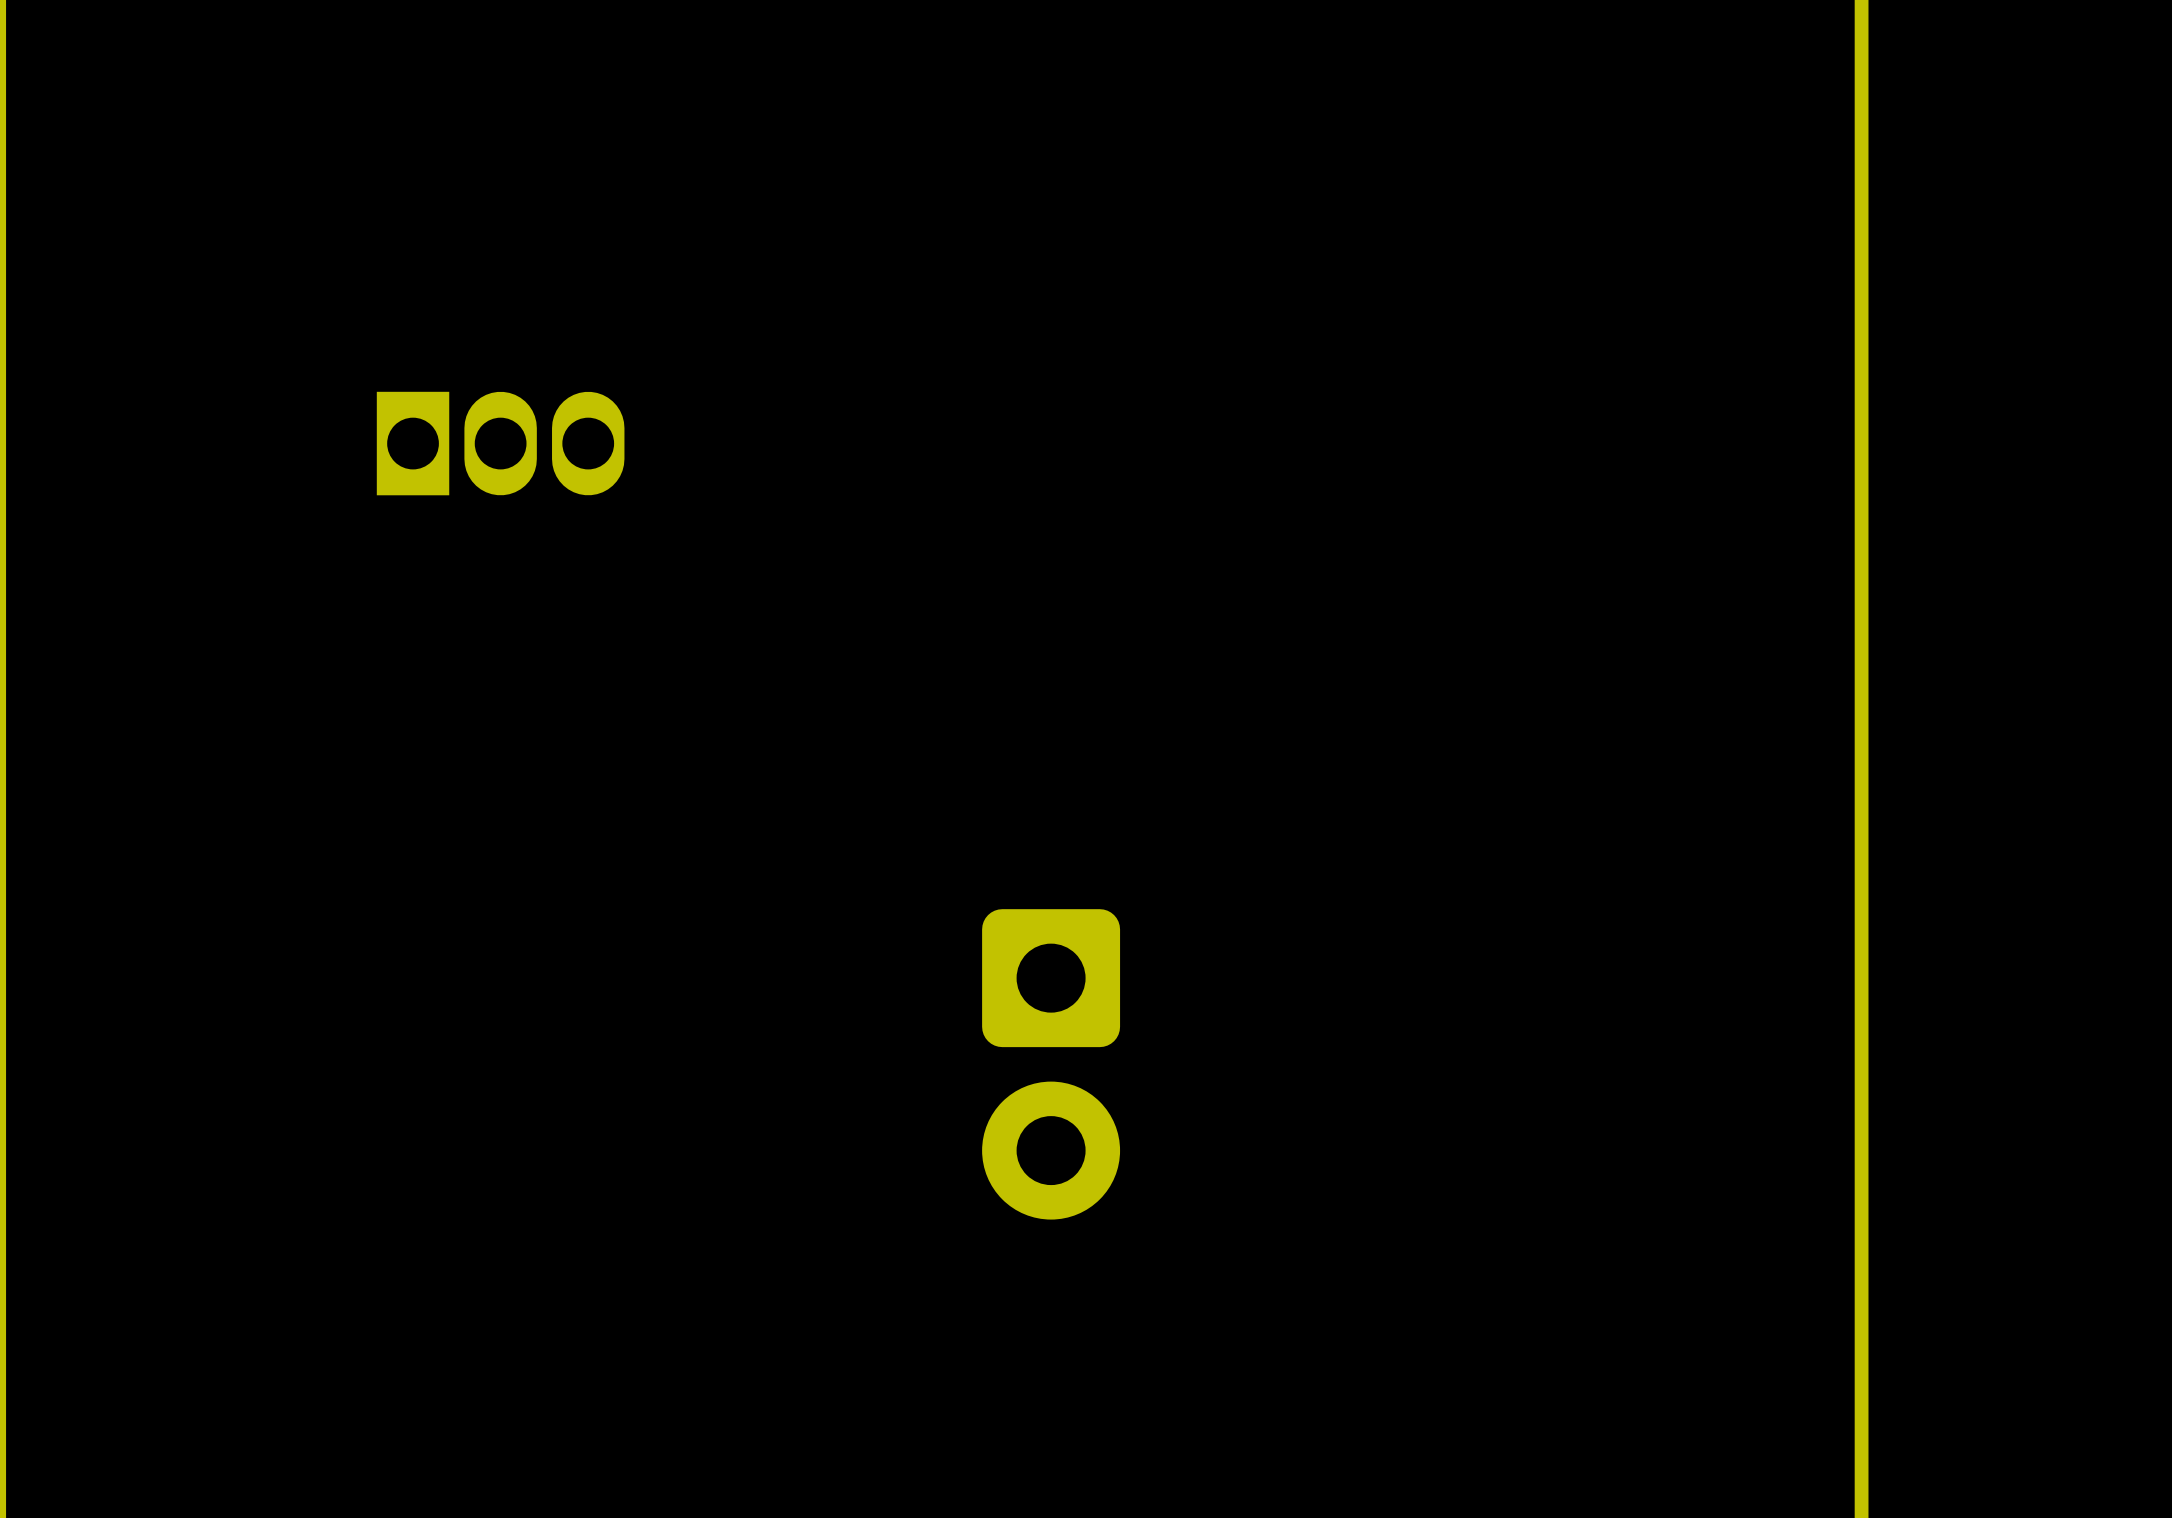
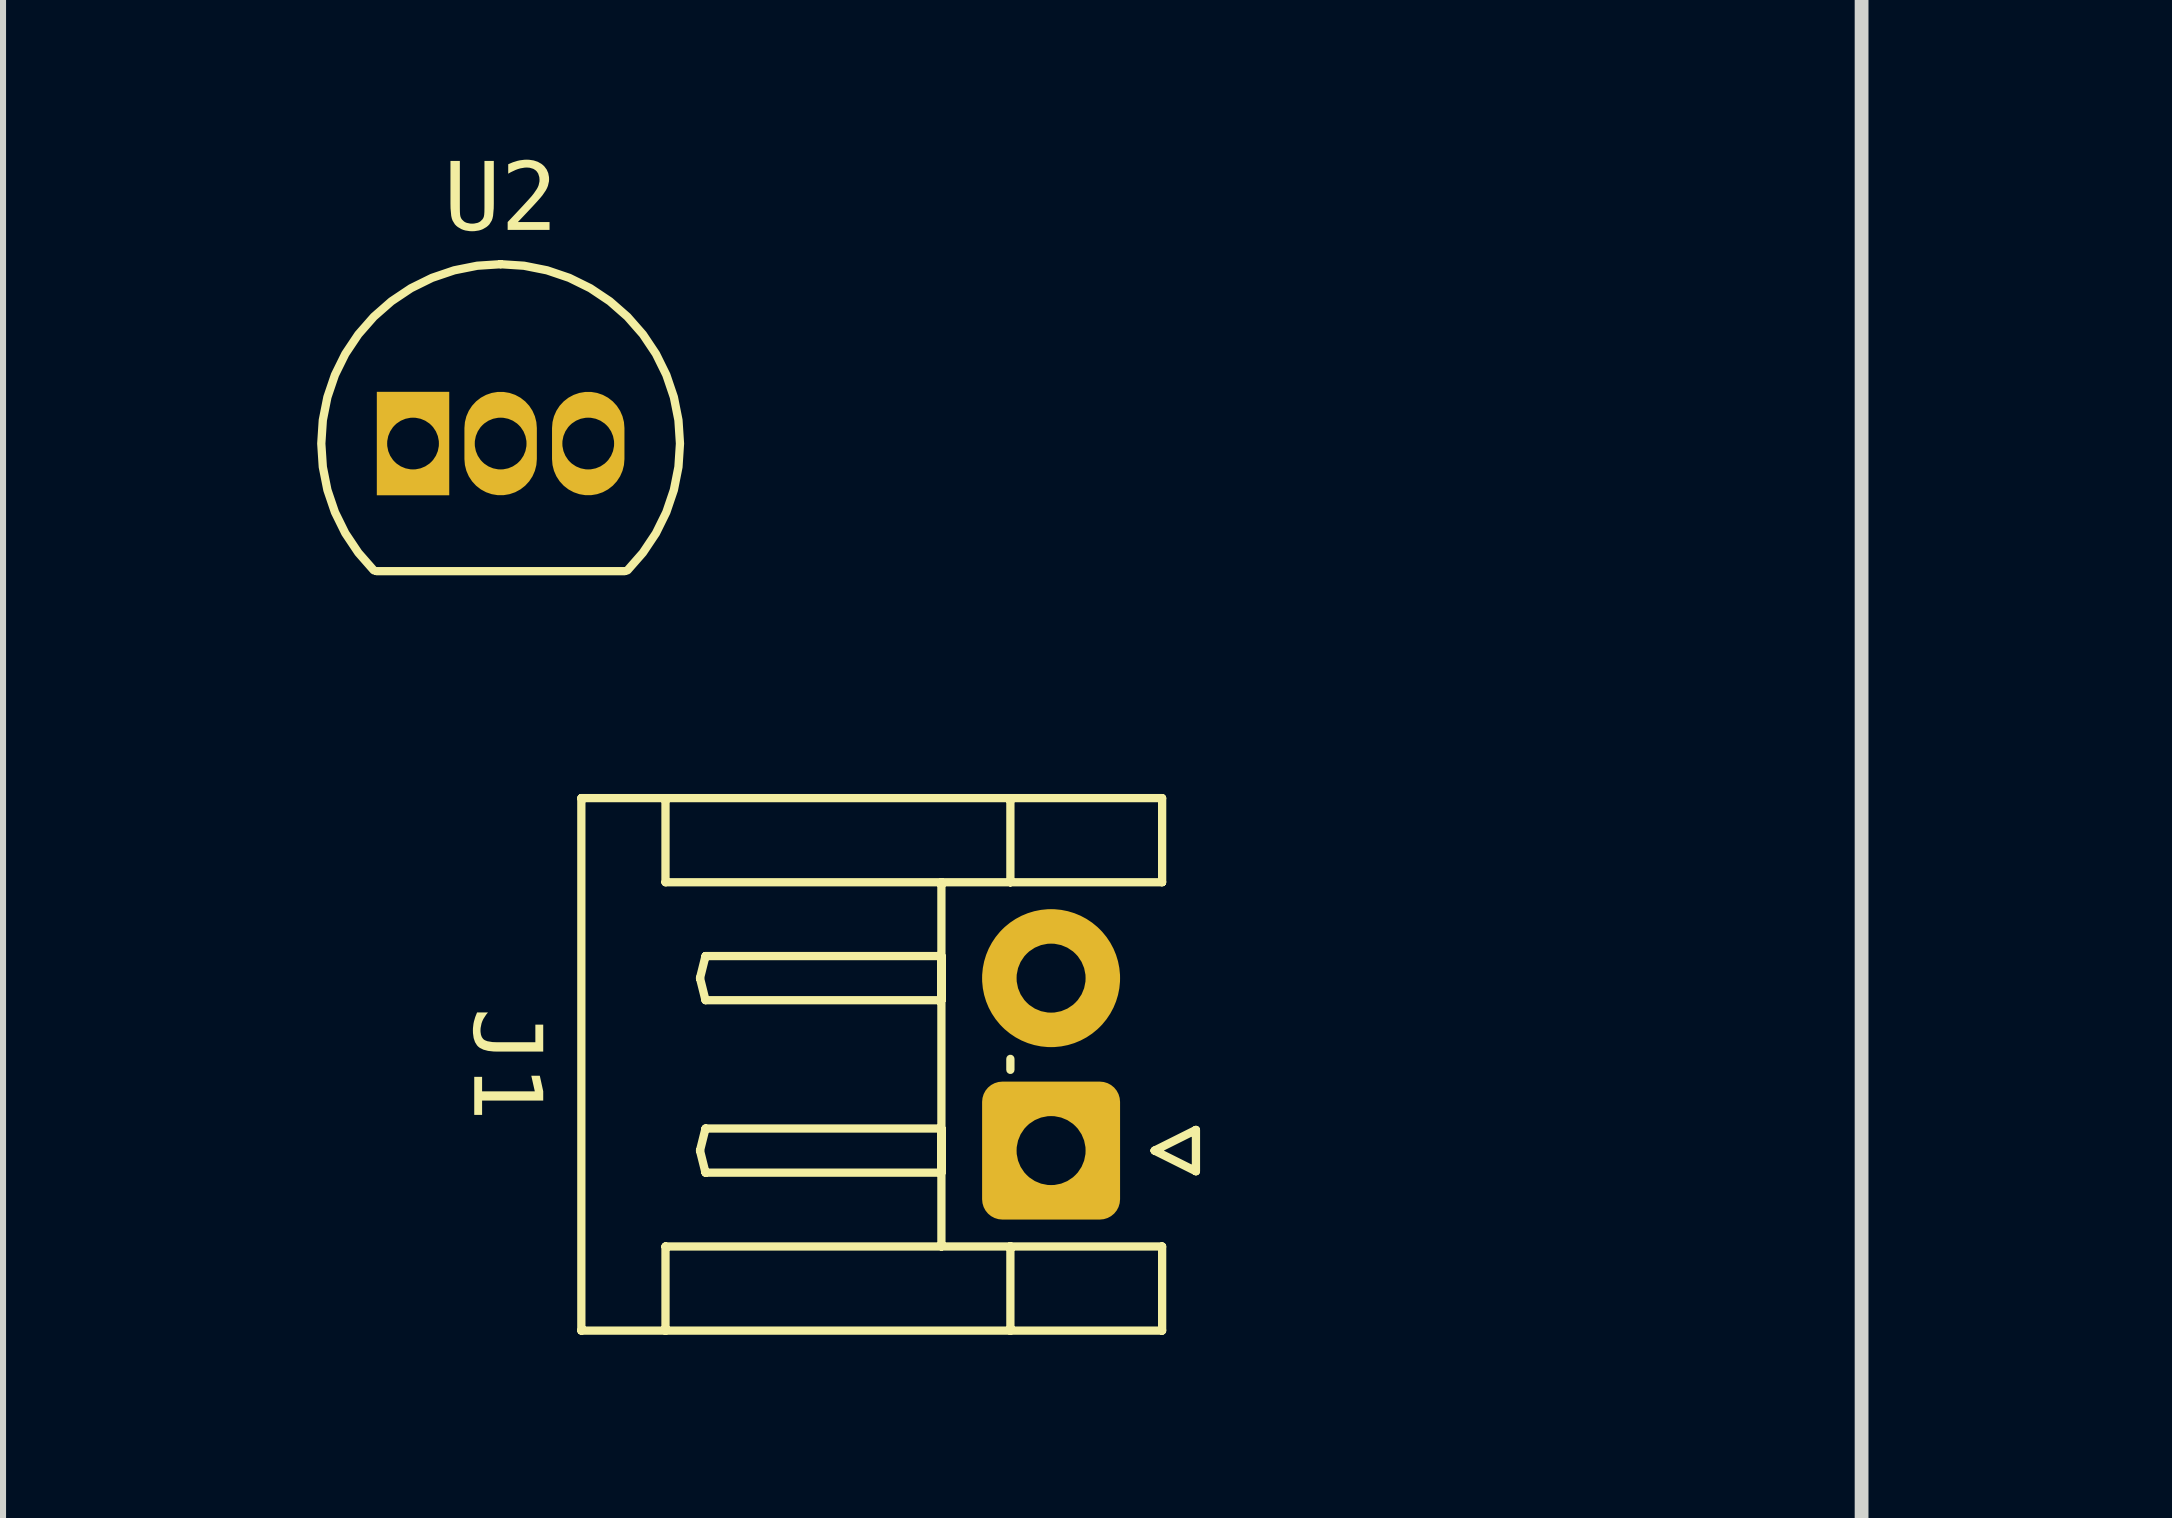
U2 side: top (500, 443) -> bottom (500, 417)
J1 side: top (1051, 1064) -> bottom (888, 1064)

